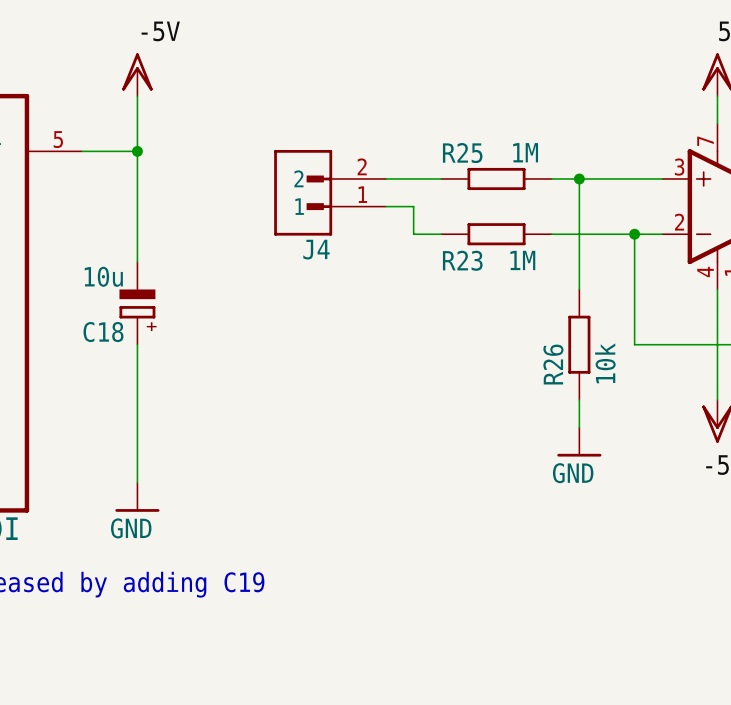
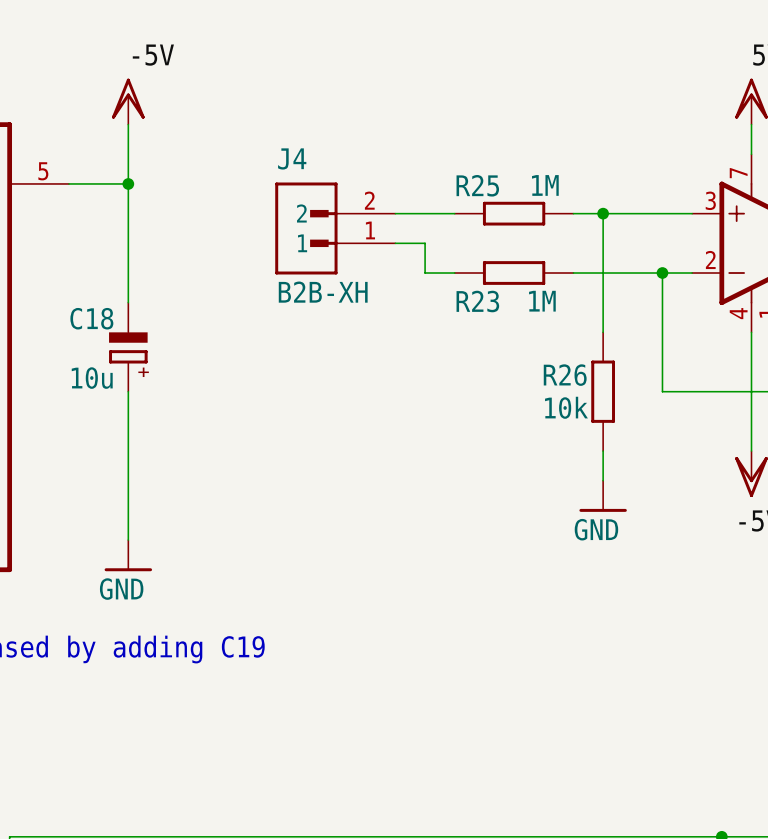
J4 name position: J4 (316, 249) -> J4 (292, 158)
J4 value: none -> B2B-XH (323, 292)
C18 value position: 10u (103, 276) -> 10u (92, 378)
C18 name position: C18 (103, 332) -> C18 (91, 318)
R26 value rotation: 0° (605, 363) -> 90° clockwise (566, 407)
R26 value position: 10k (605, 363) -> 10k (566, 407)
R26 name rotation: 0° (553, 364) -> 90° clockwise (565, 375)

